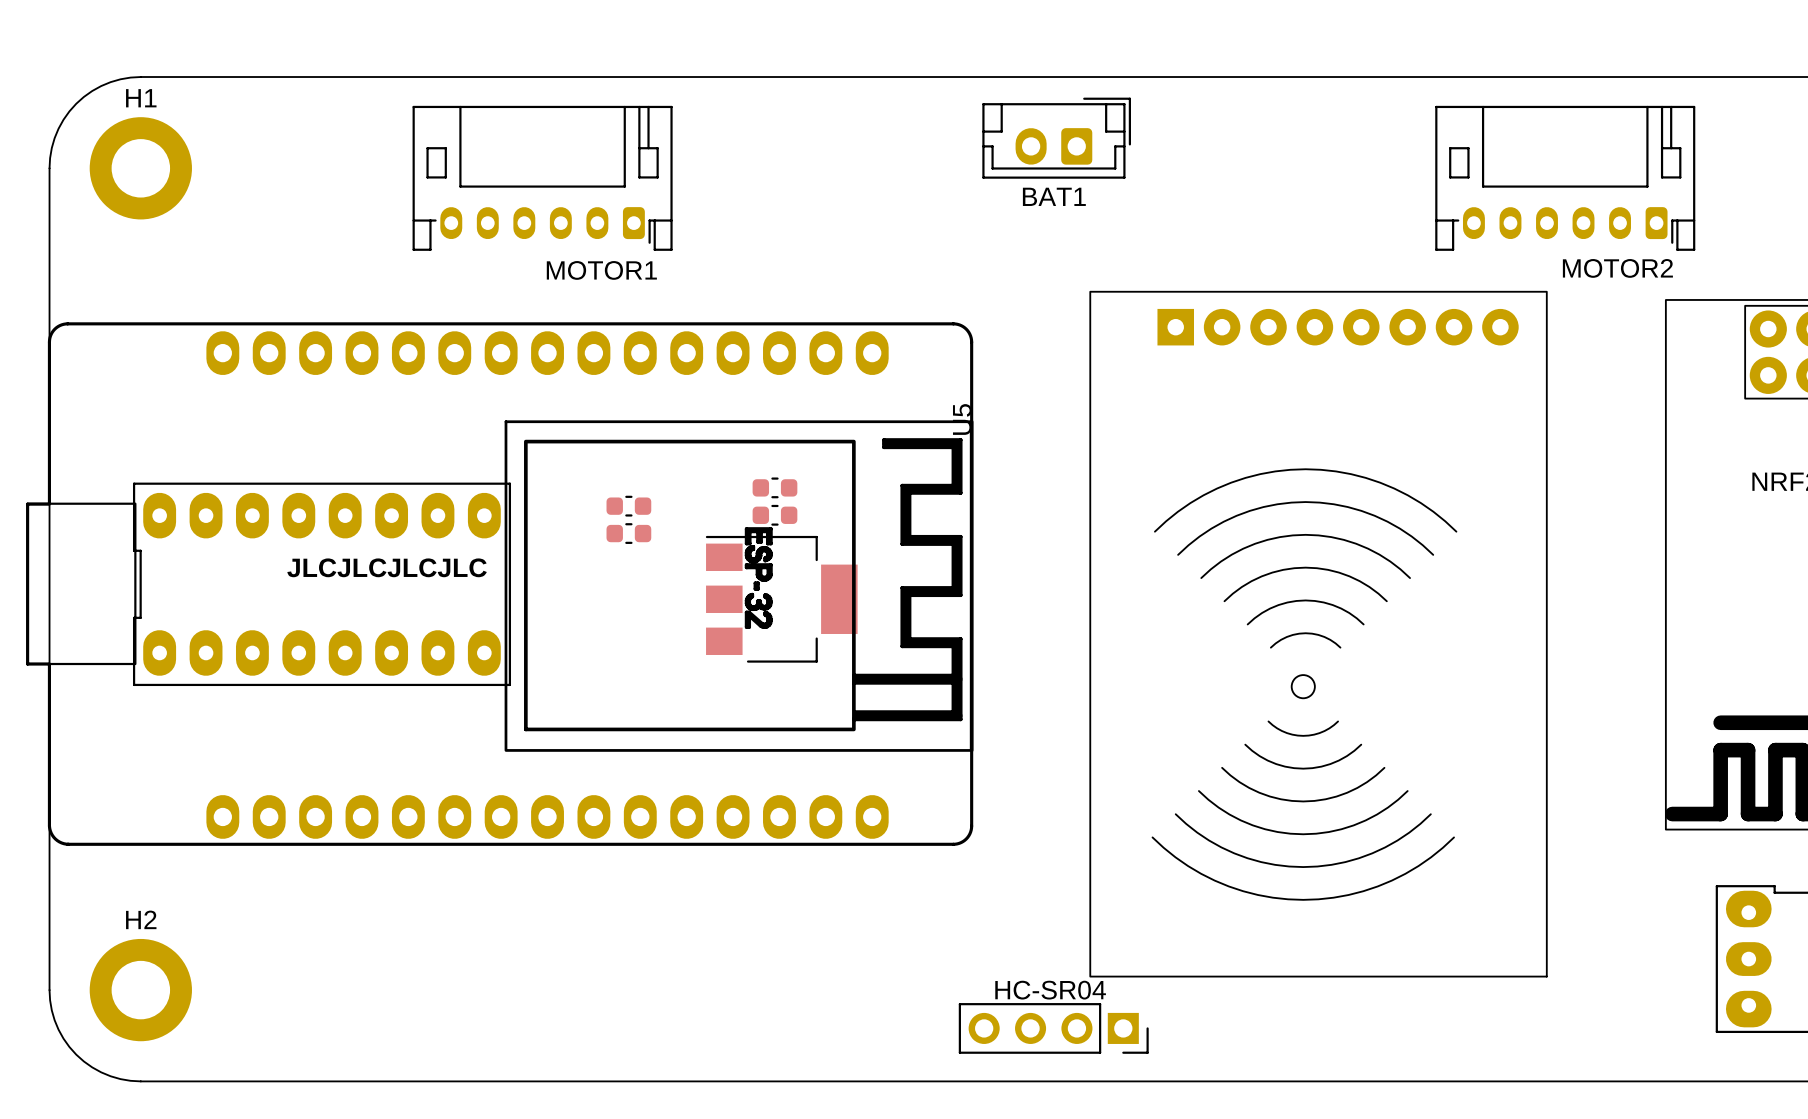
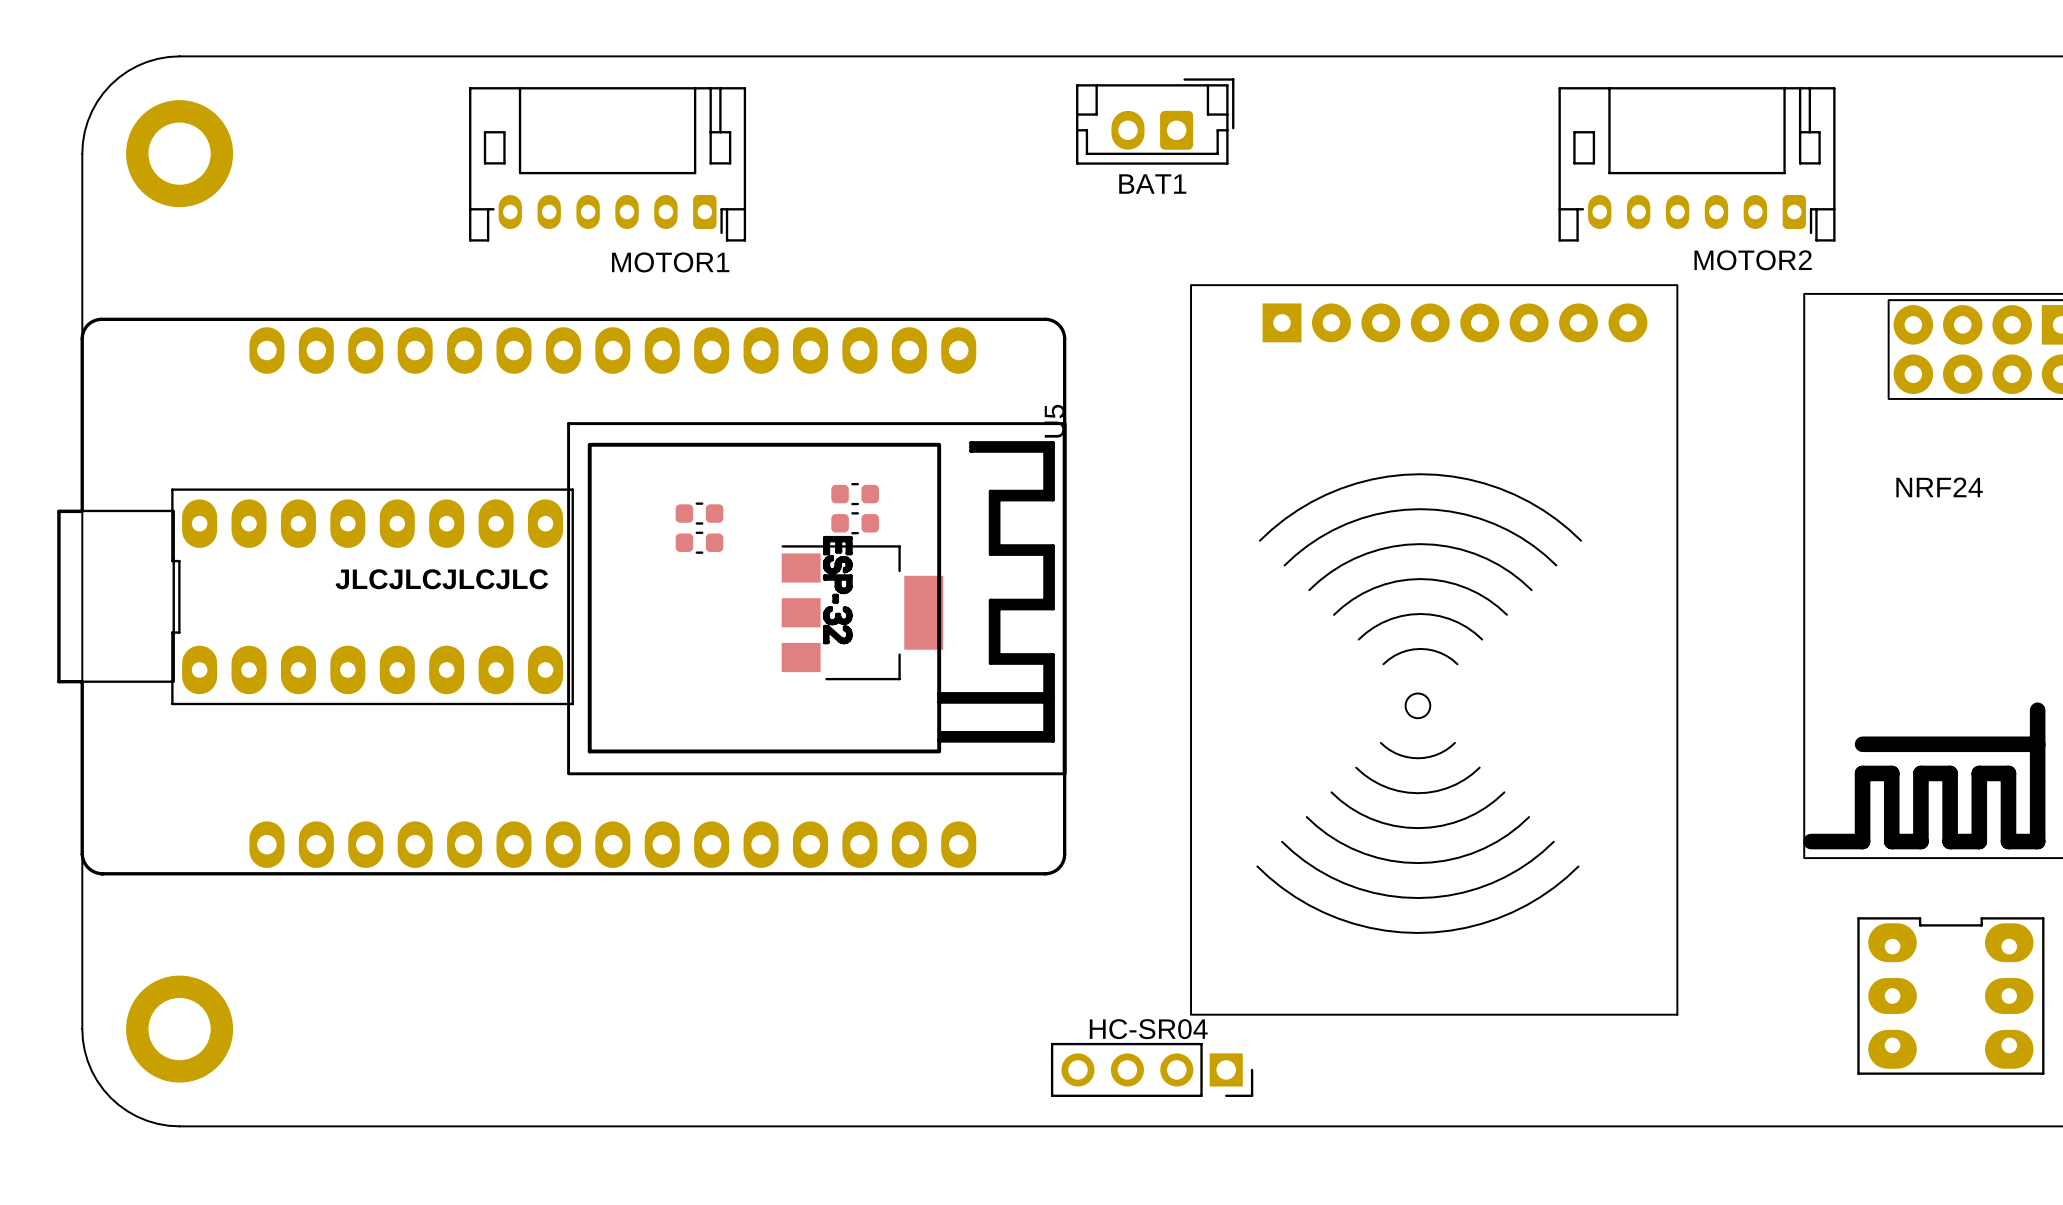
H1: (140, 168) -> none
part: none -> (179, 153)
H2: (140, 990) -> none
part: none -> (179, 1029)

